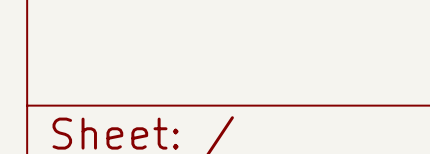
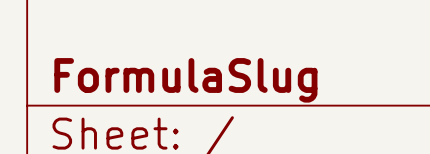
title block: none -> FormulaSlug (185, 80)

